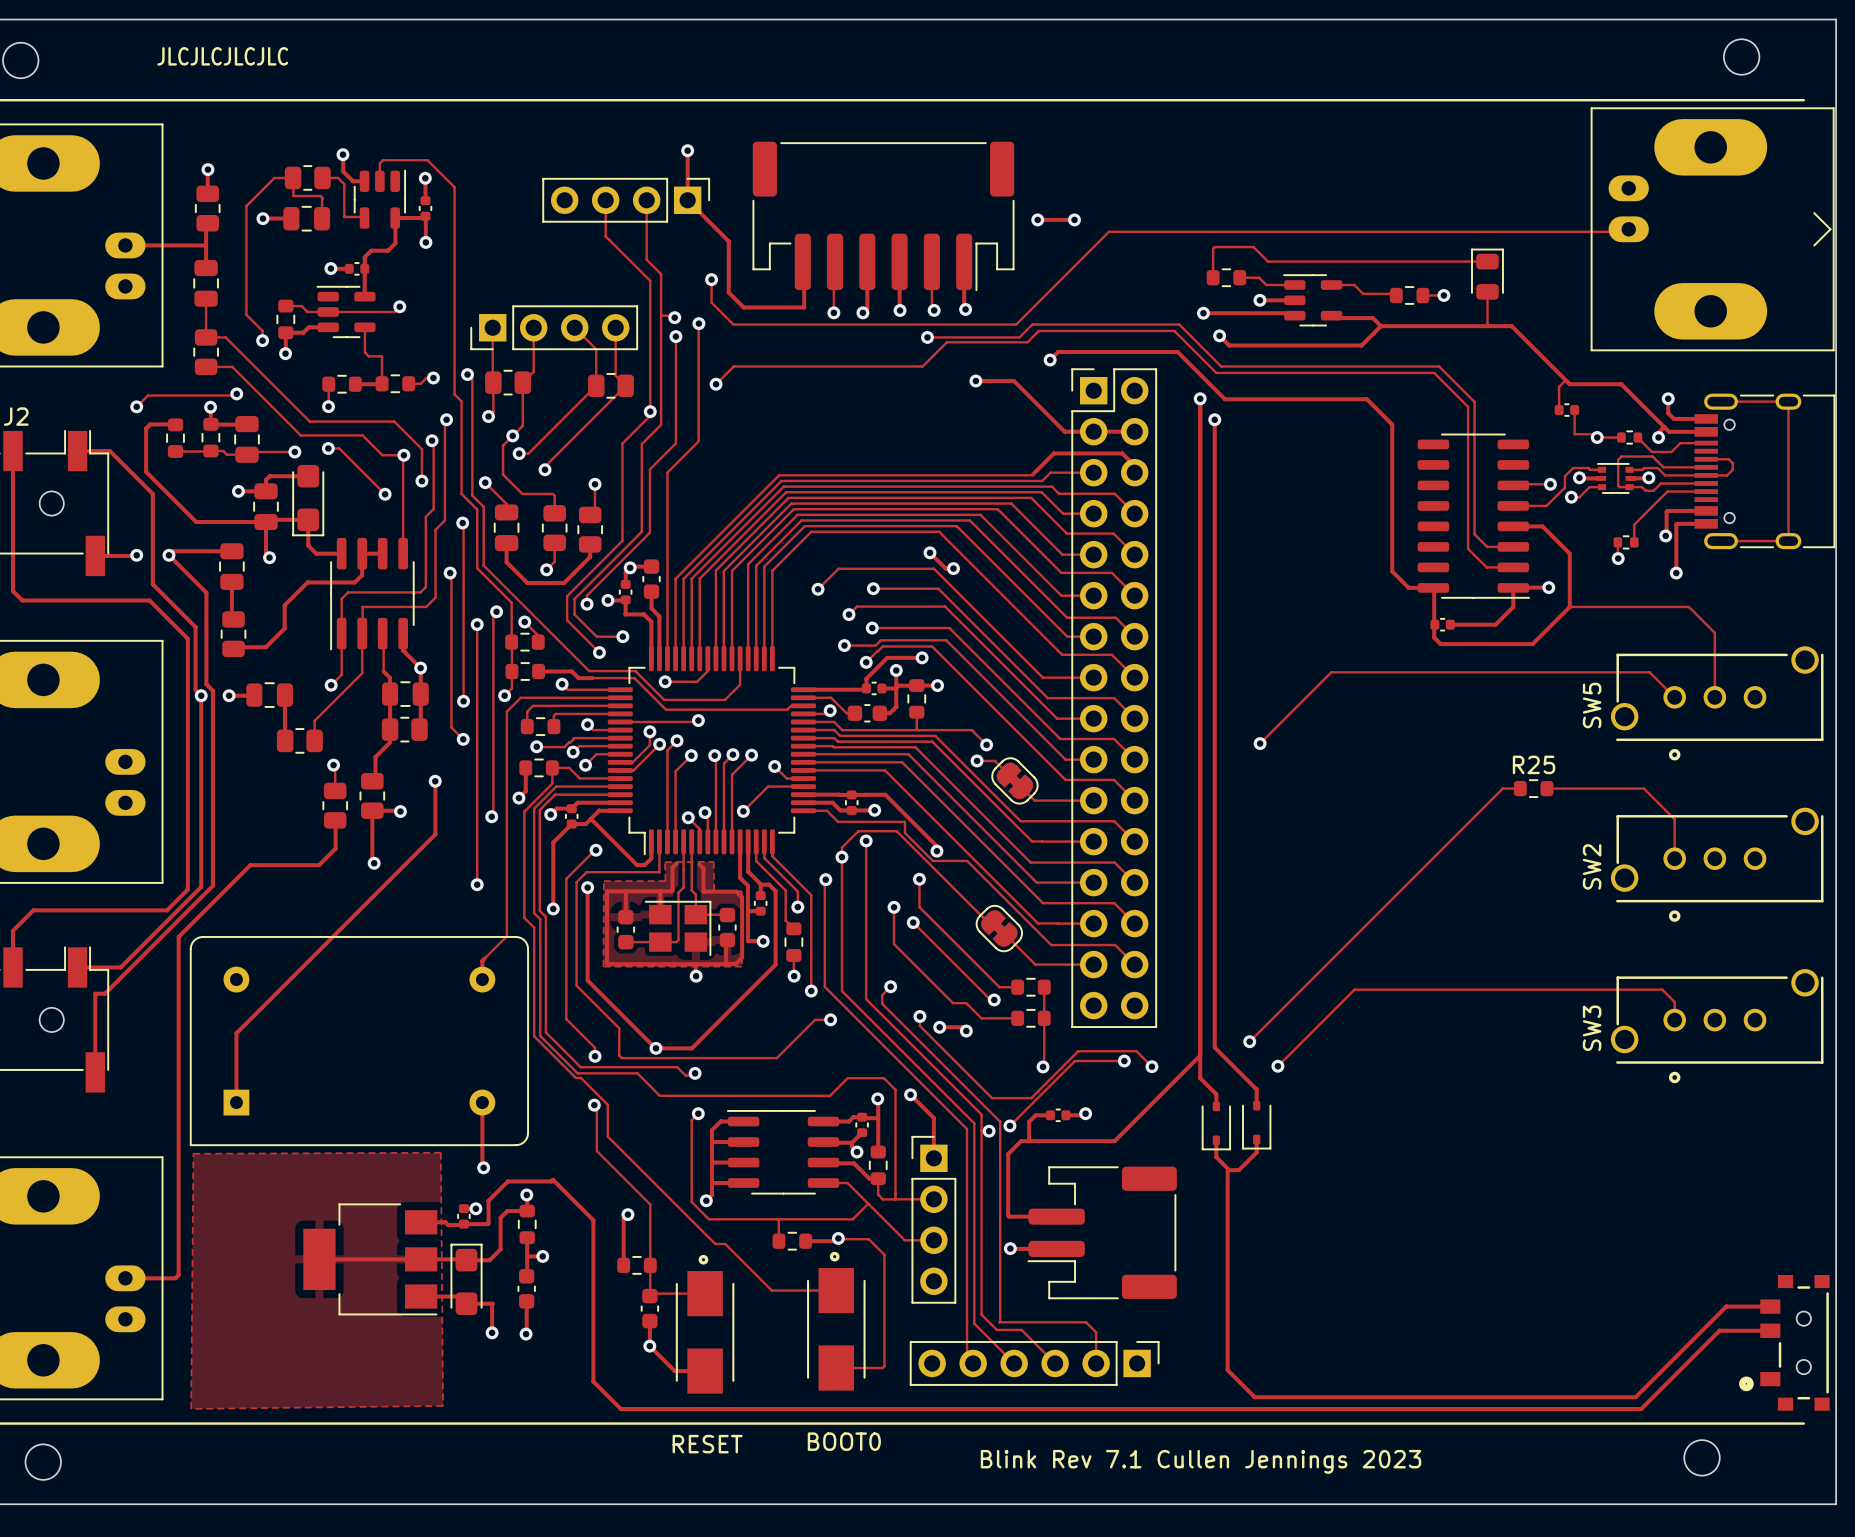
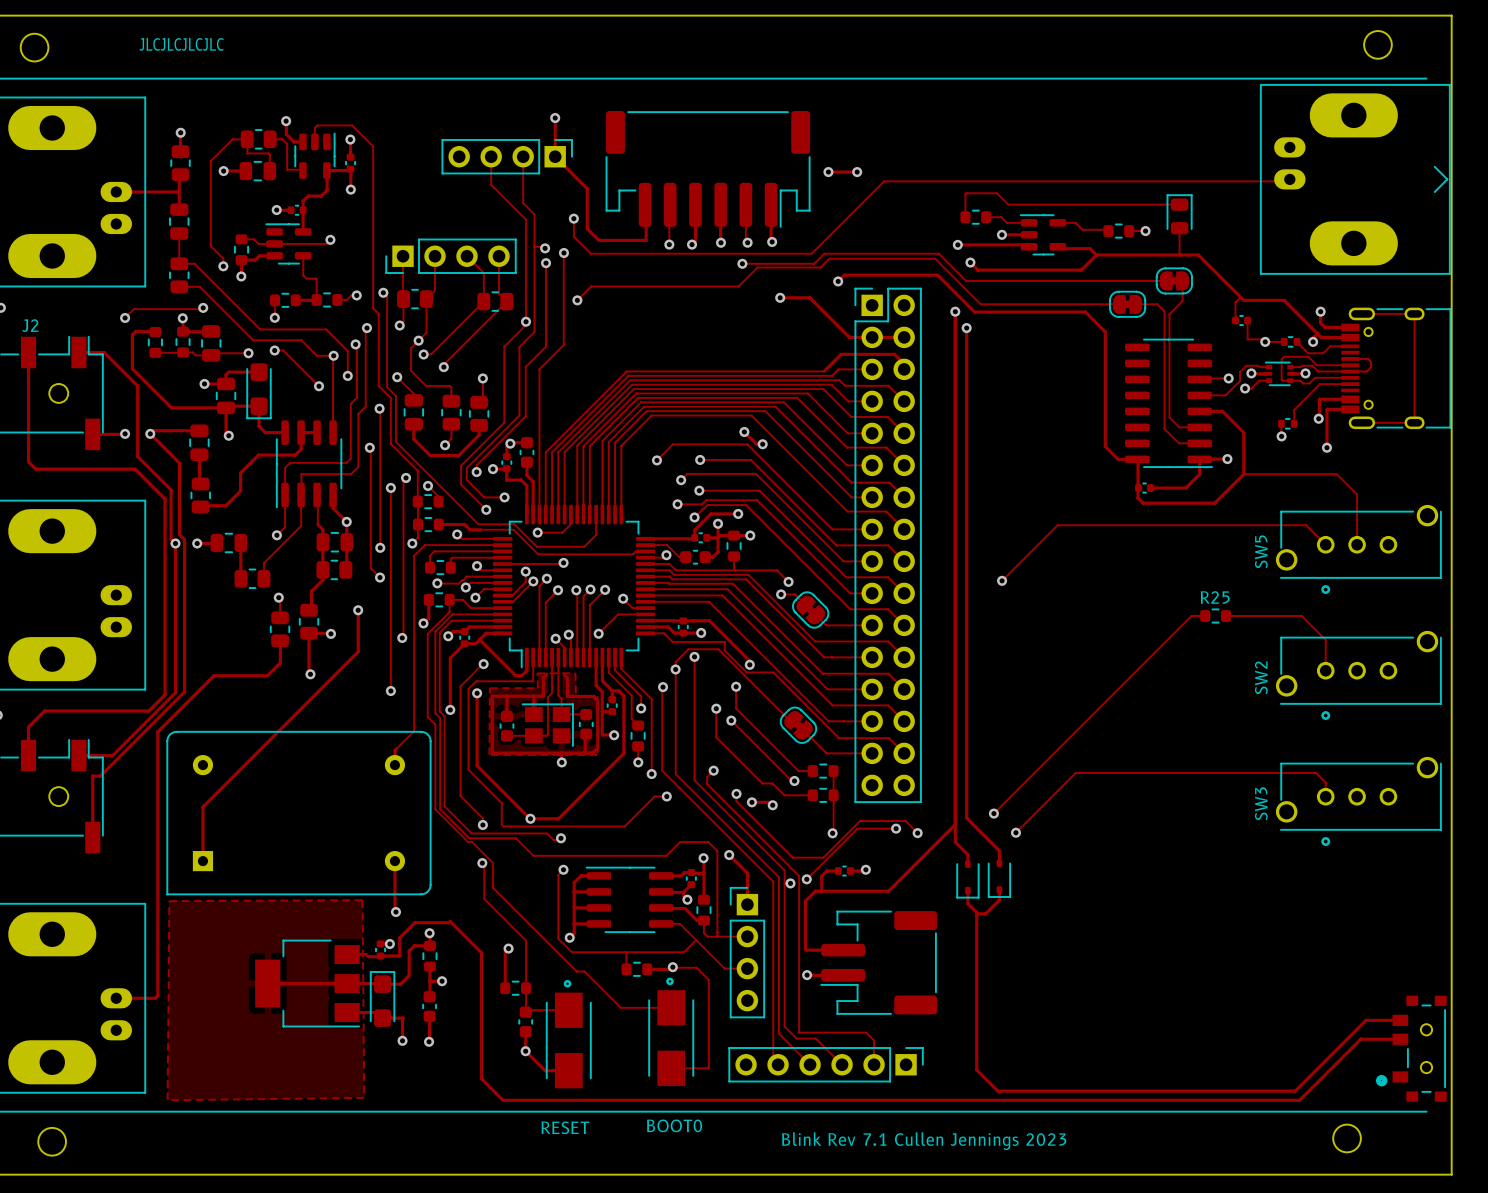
track: (1214, 359) (1221, 366) (1439, 366) (1474, 401) -> (966, 280) (1166, 280)
part: none -> (1174, 280)
track: none -> (1182, 280) (1182, 301) (1169, 314)
track: (1216, 372) (1434, 372) (1468, 406) -> (967, 291) (980, 304) (1119, 304)
part: none -> (1127, 304)
track: none -> (1135, 304) (1157, 304) (1164, 311) (1164, 317)

